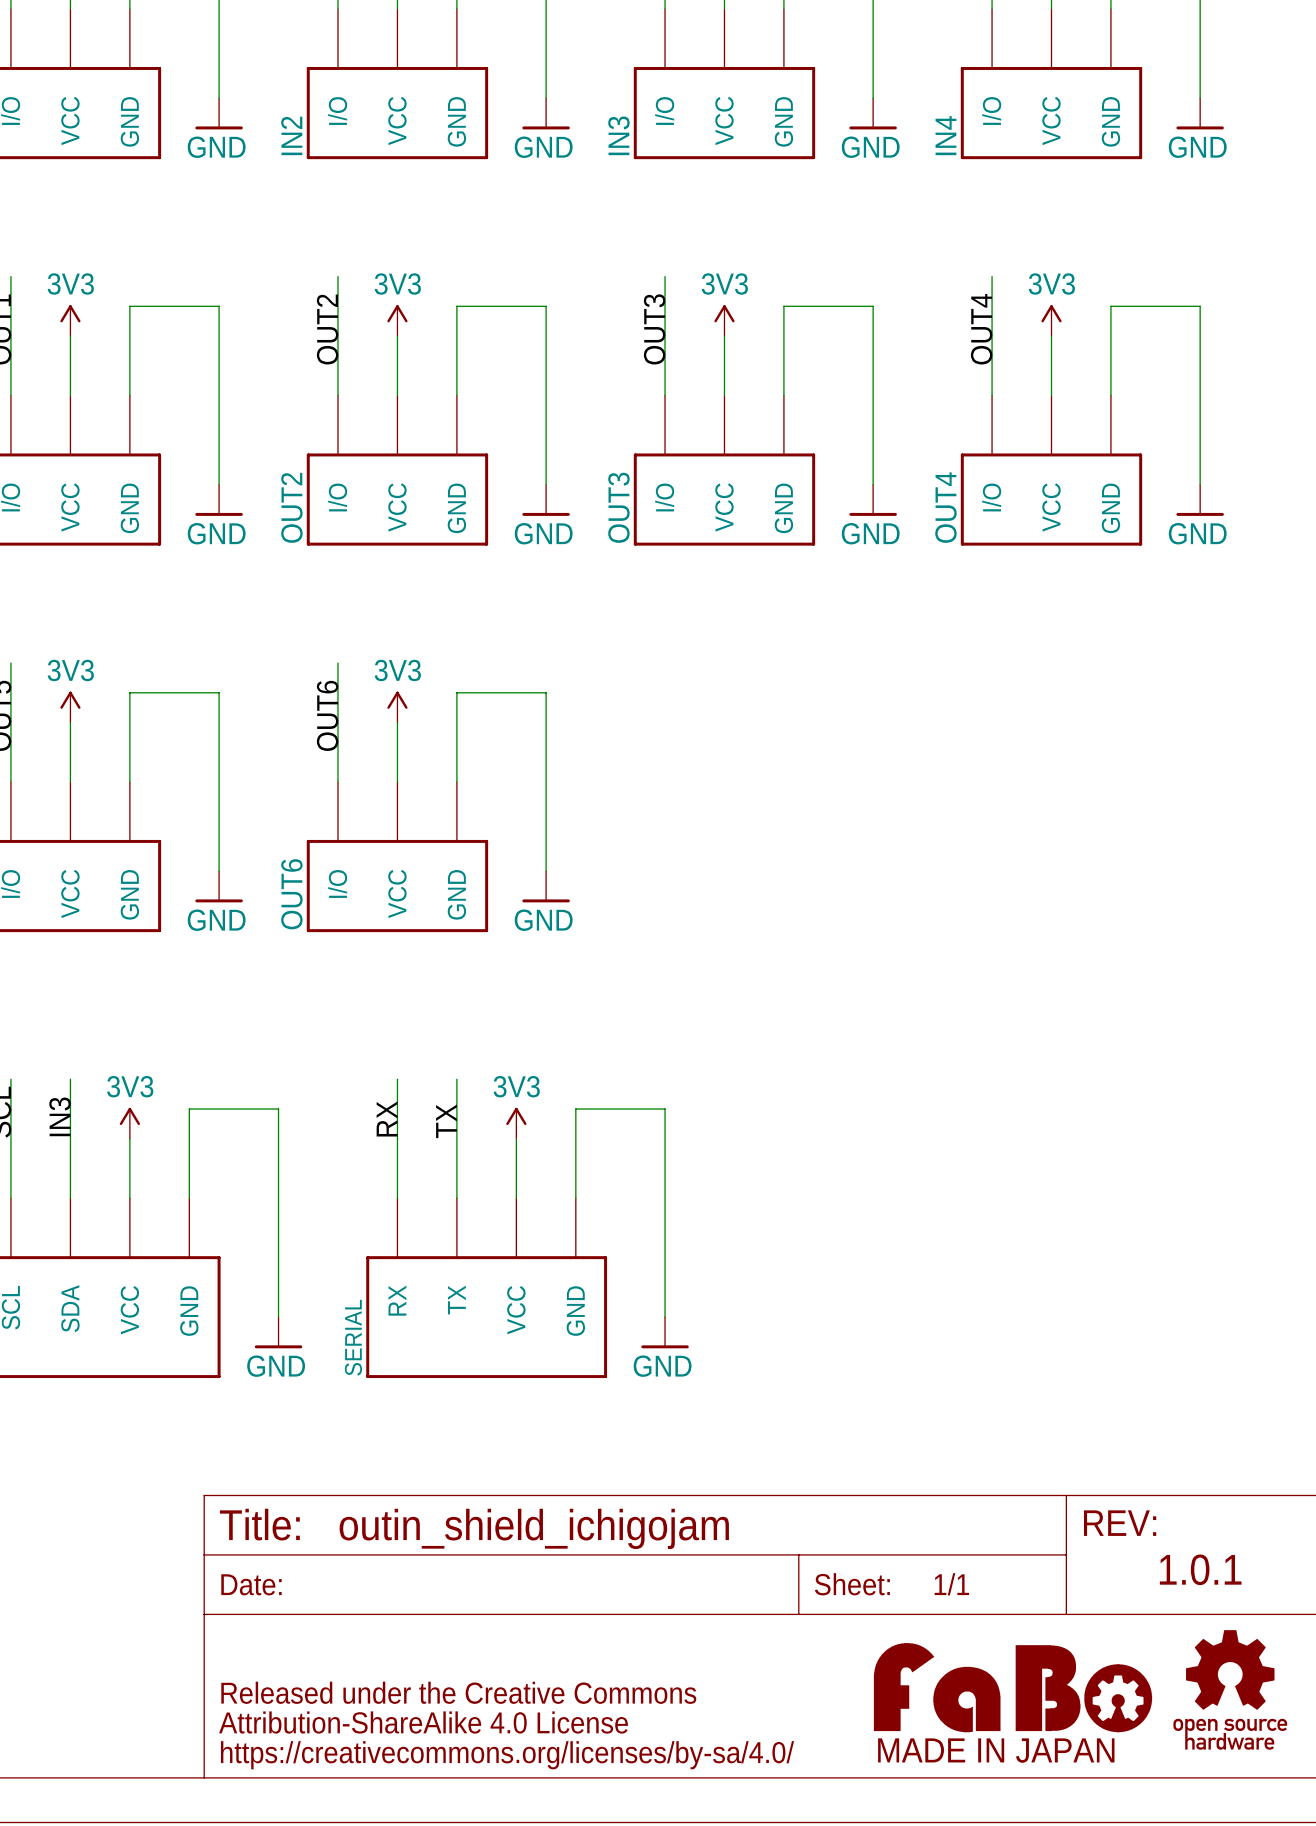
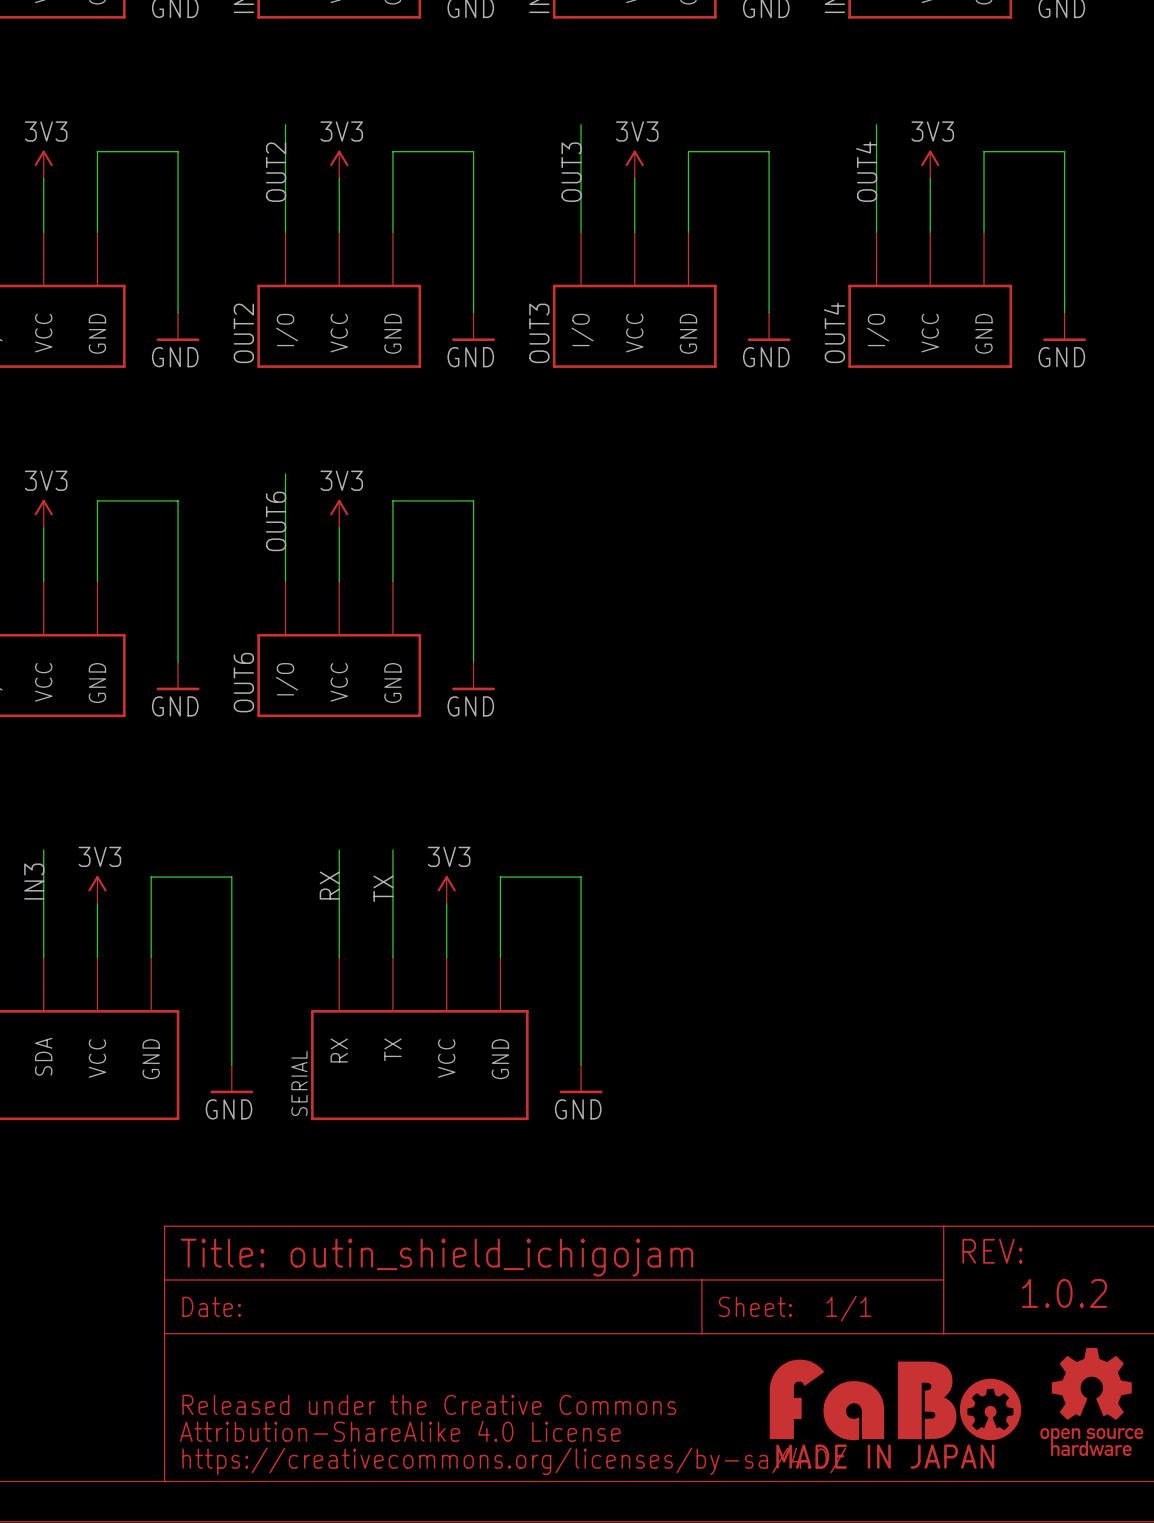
text: 1.0.1 (1200, 1569) -> 1.0.2 (1064, 1293)

